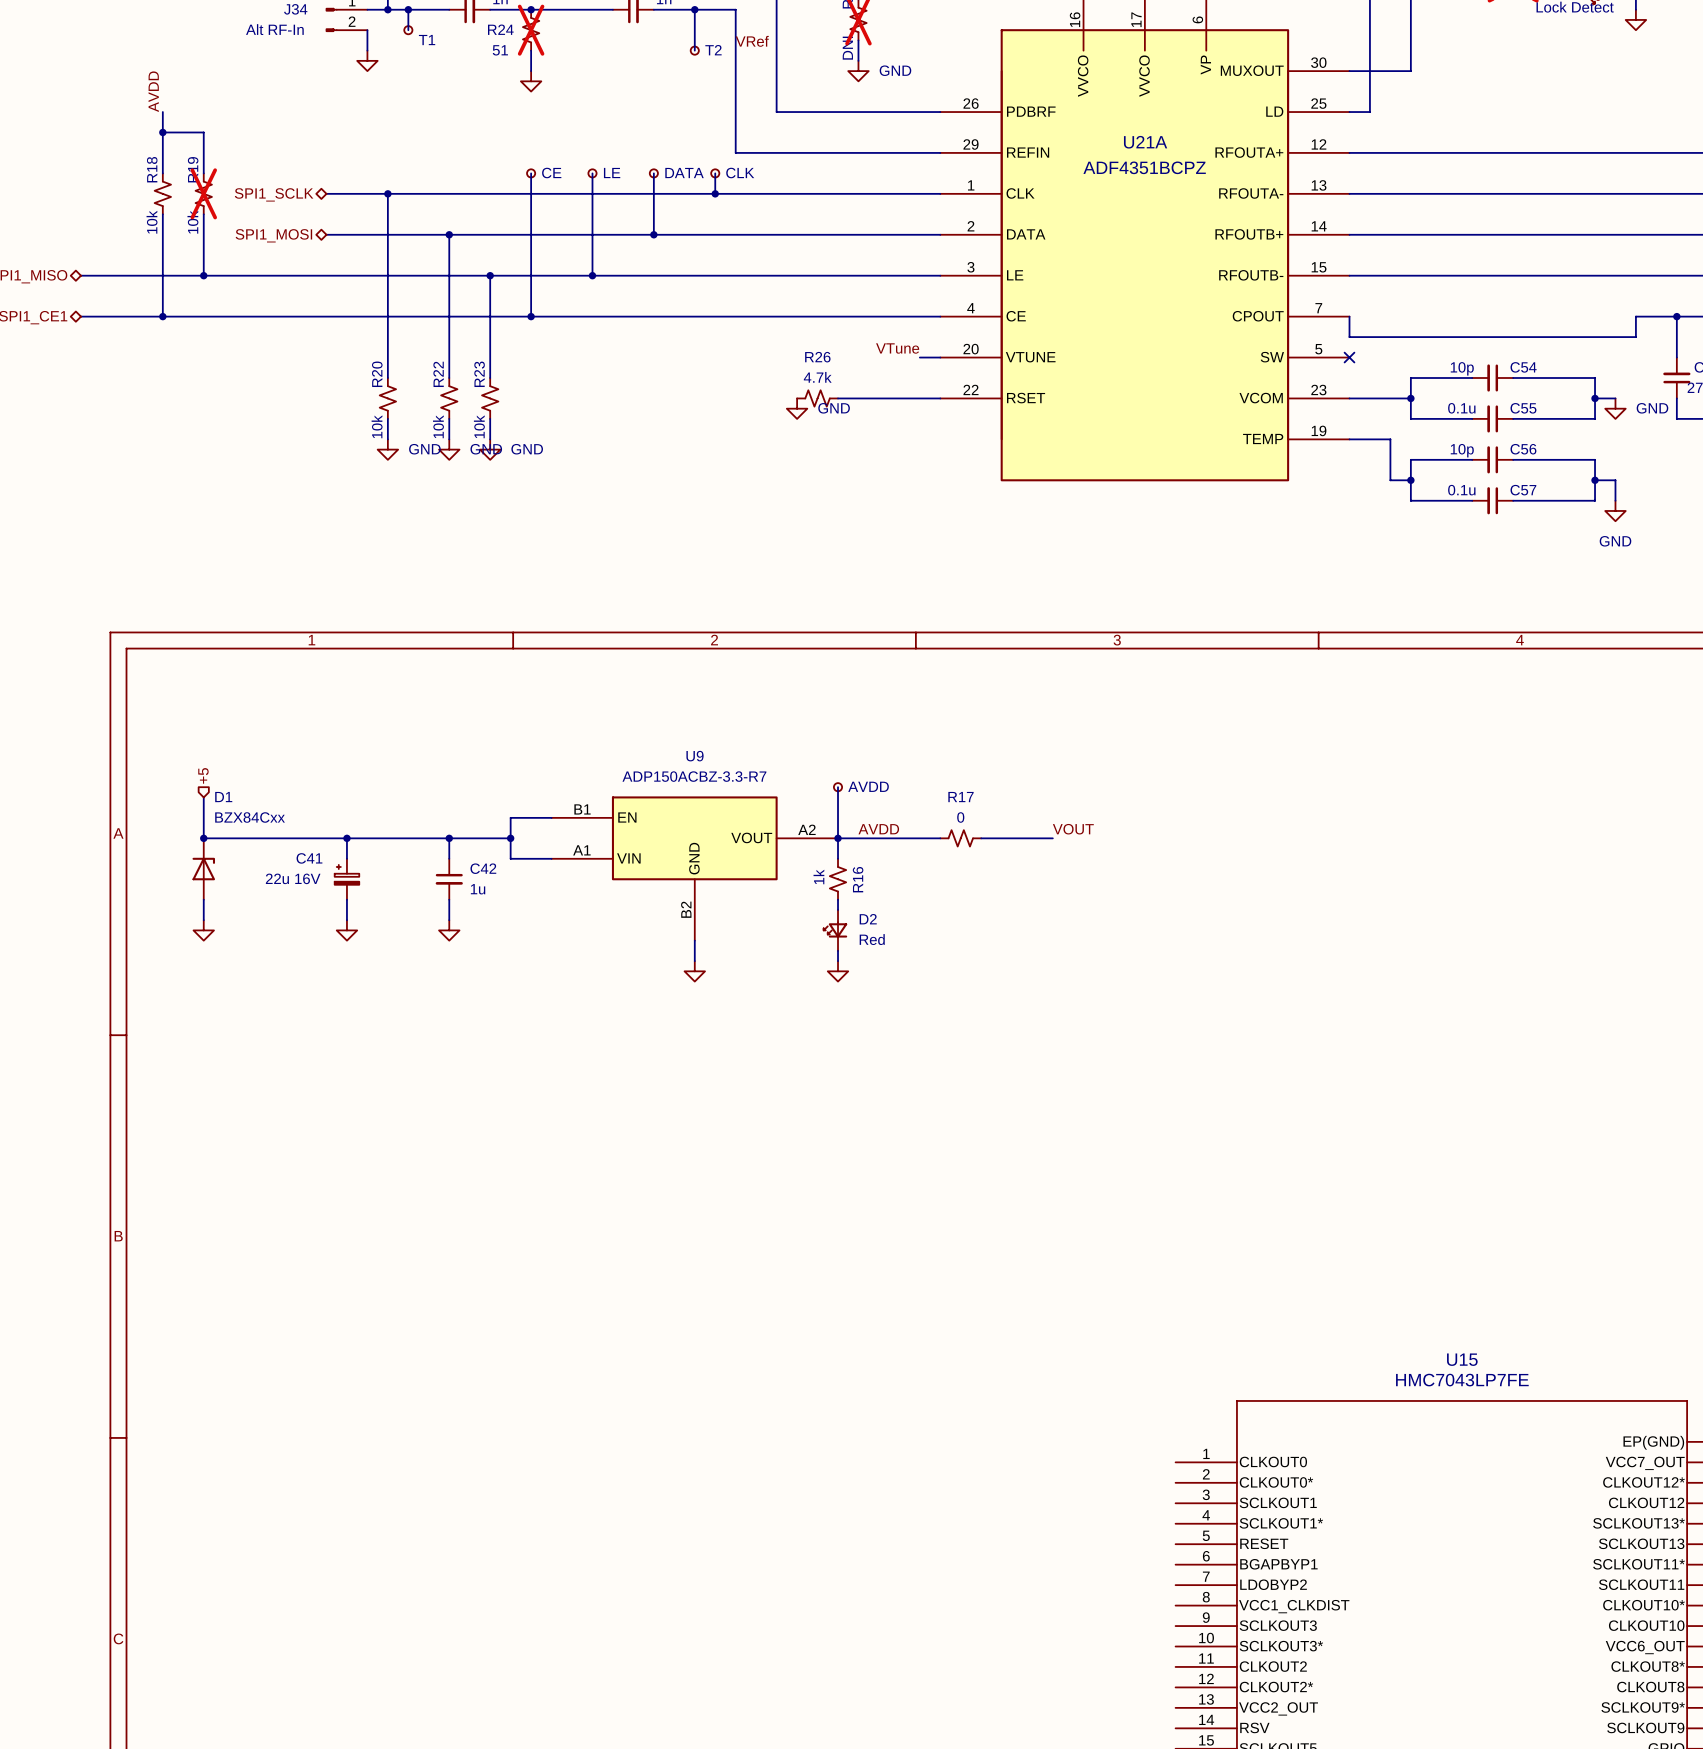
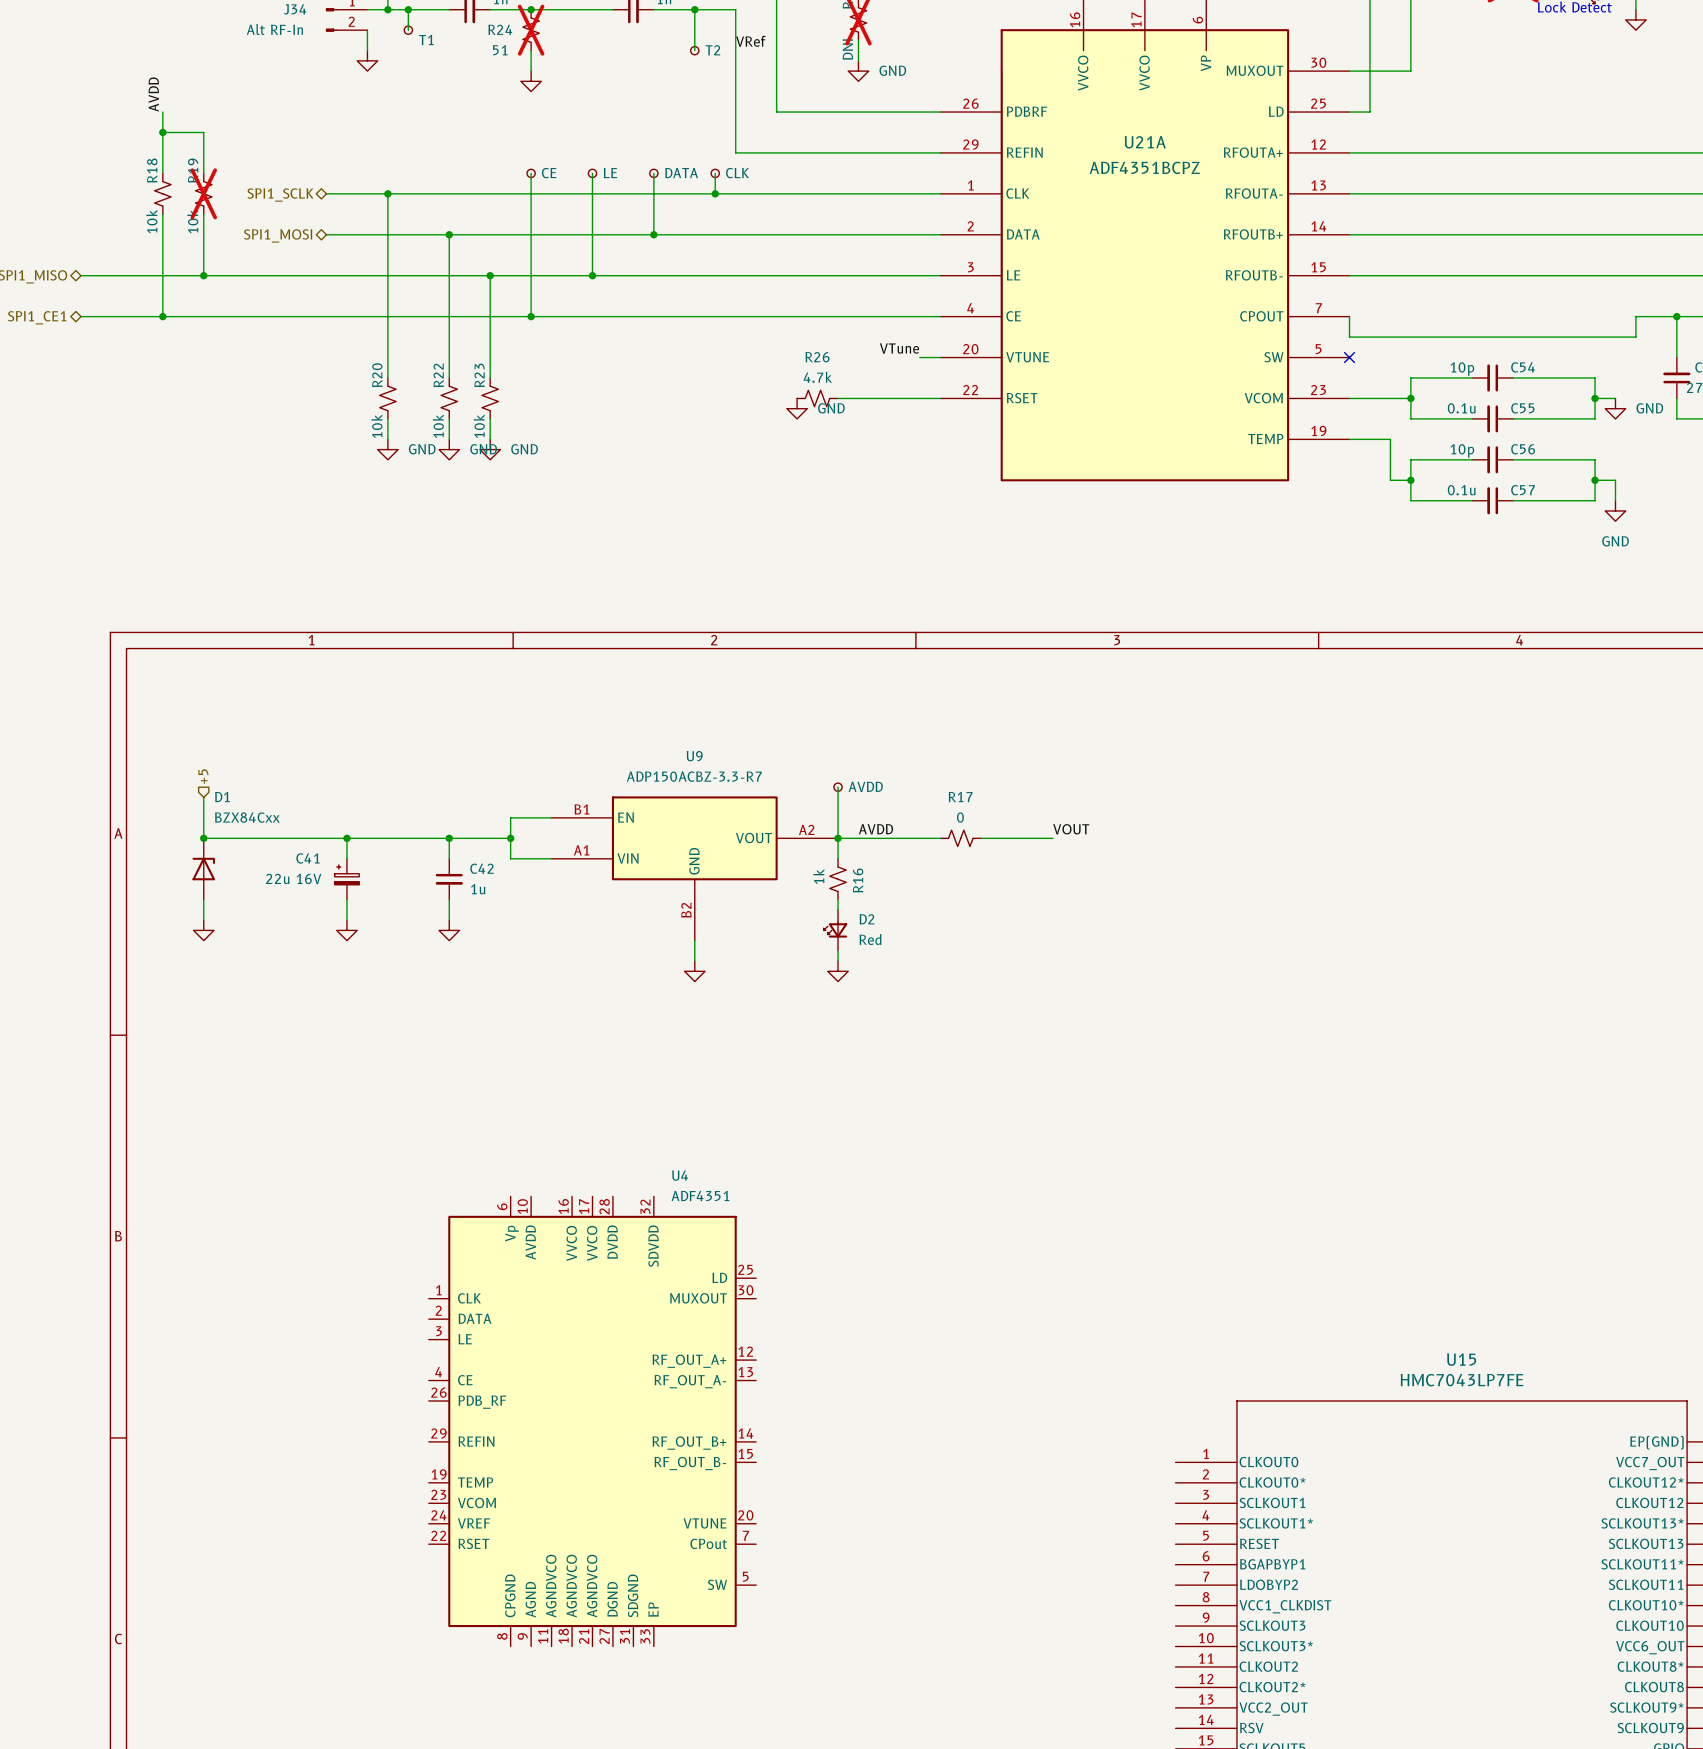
U4: none -> ADF4351 (592, 1421)

